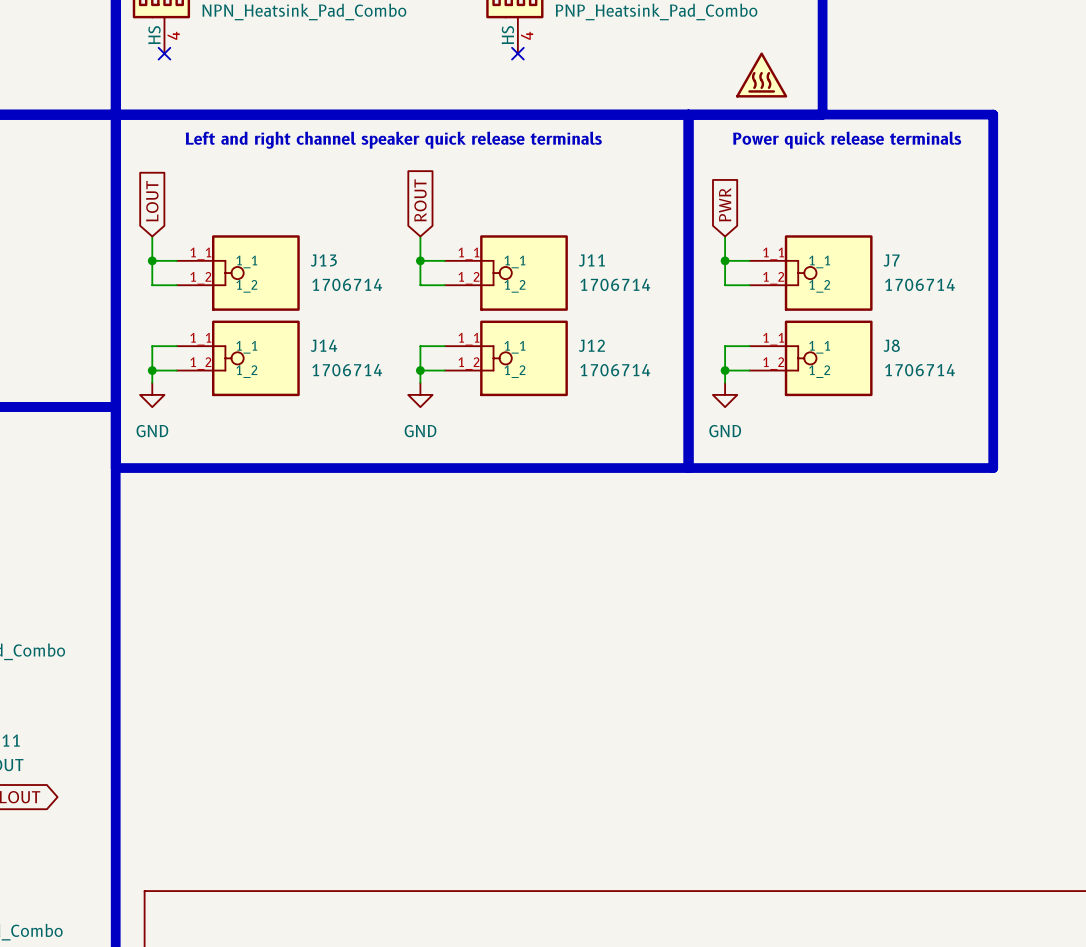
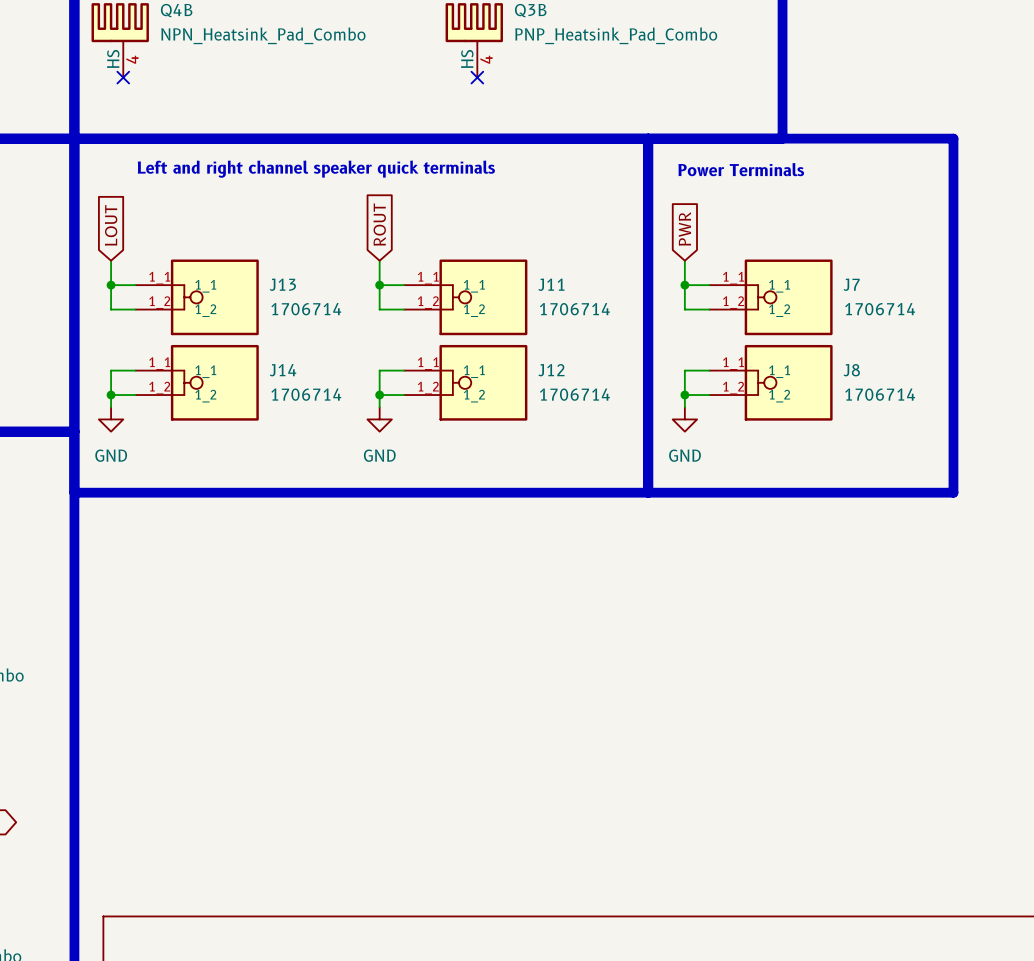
power symbol: (761, 75) -> none
text: Left and right channel speaker quick release terminals (393, 140) -> Left and right channel speaker quick terminals (316, 169)
text: Power quick release terminals (847, 140) -> Power Terminals (741, 169)

